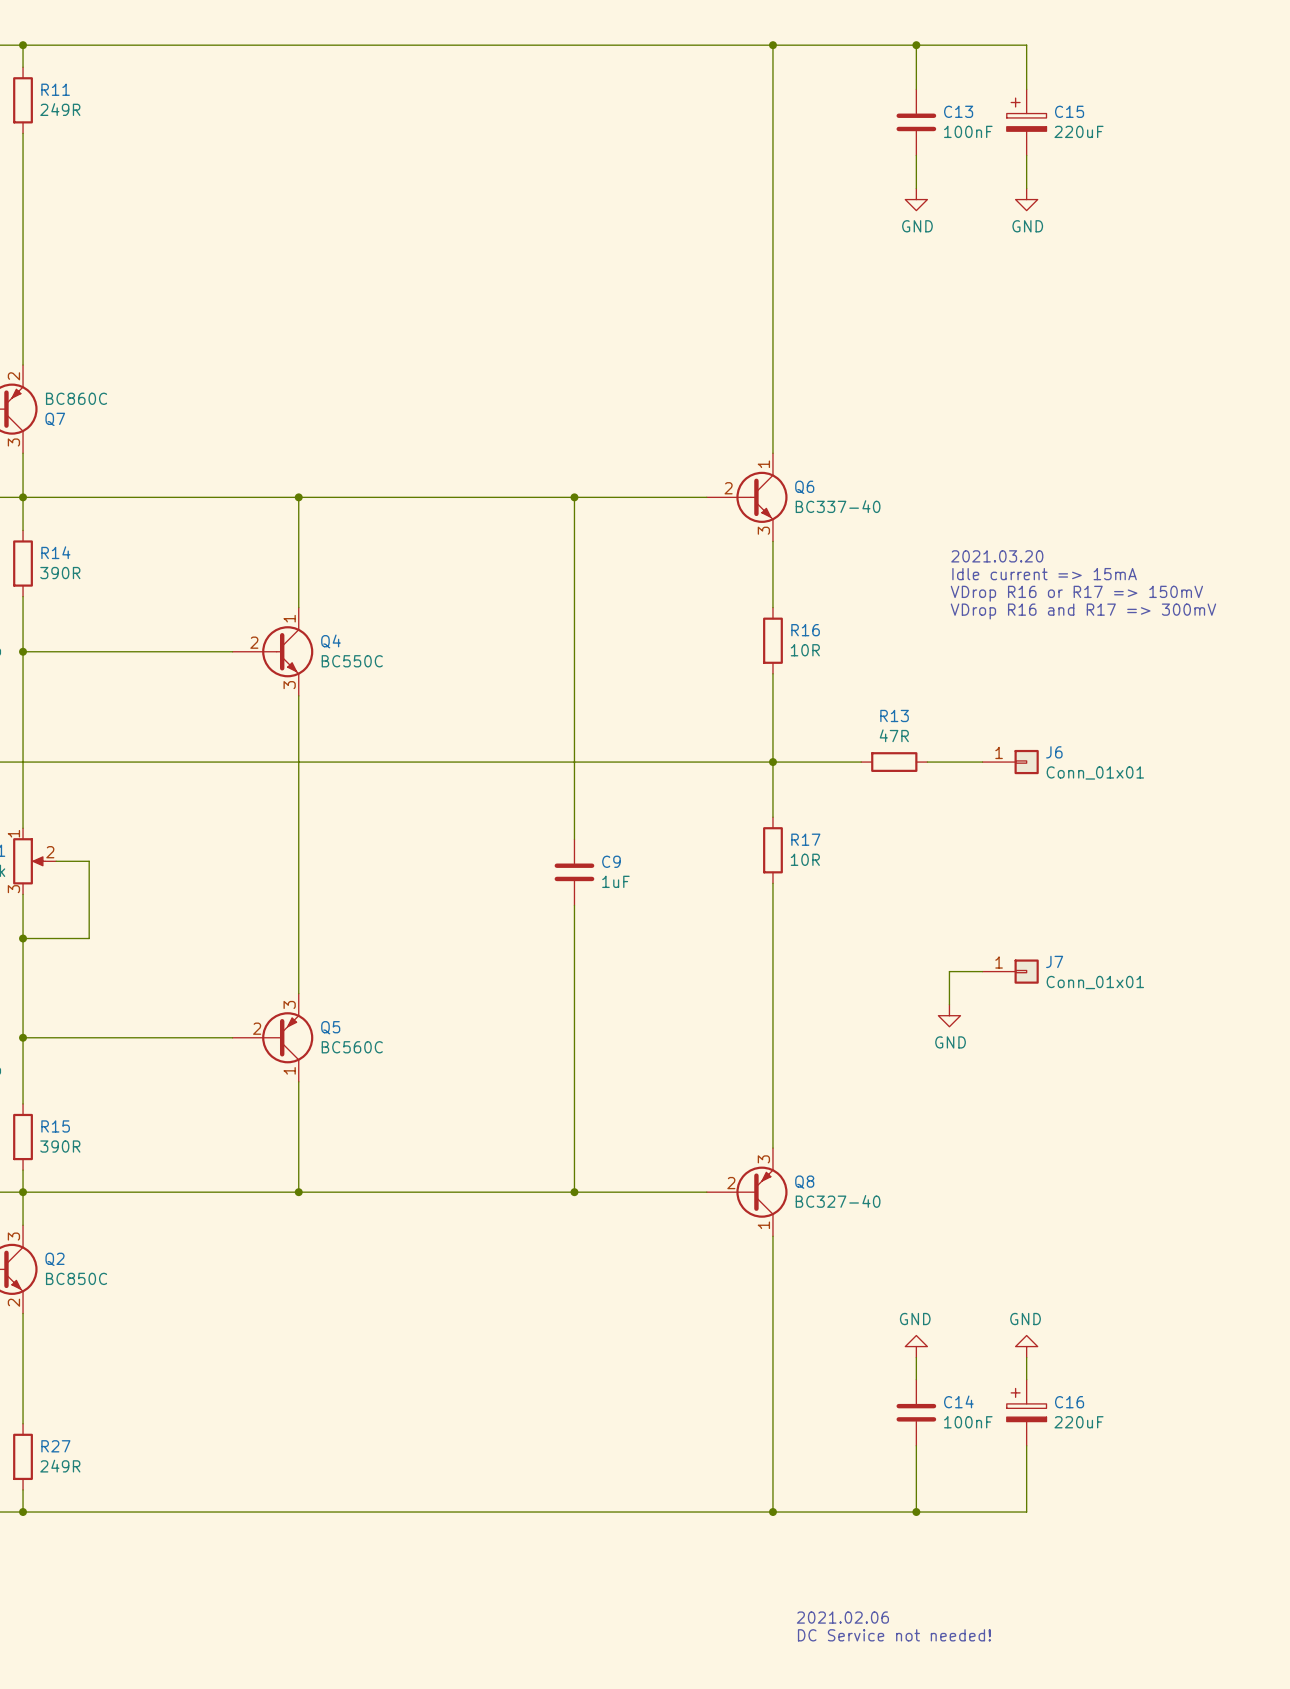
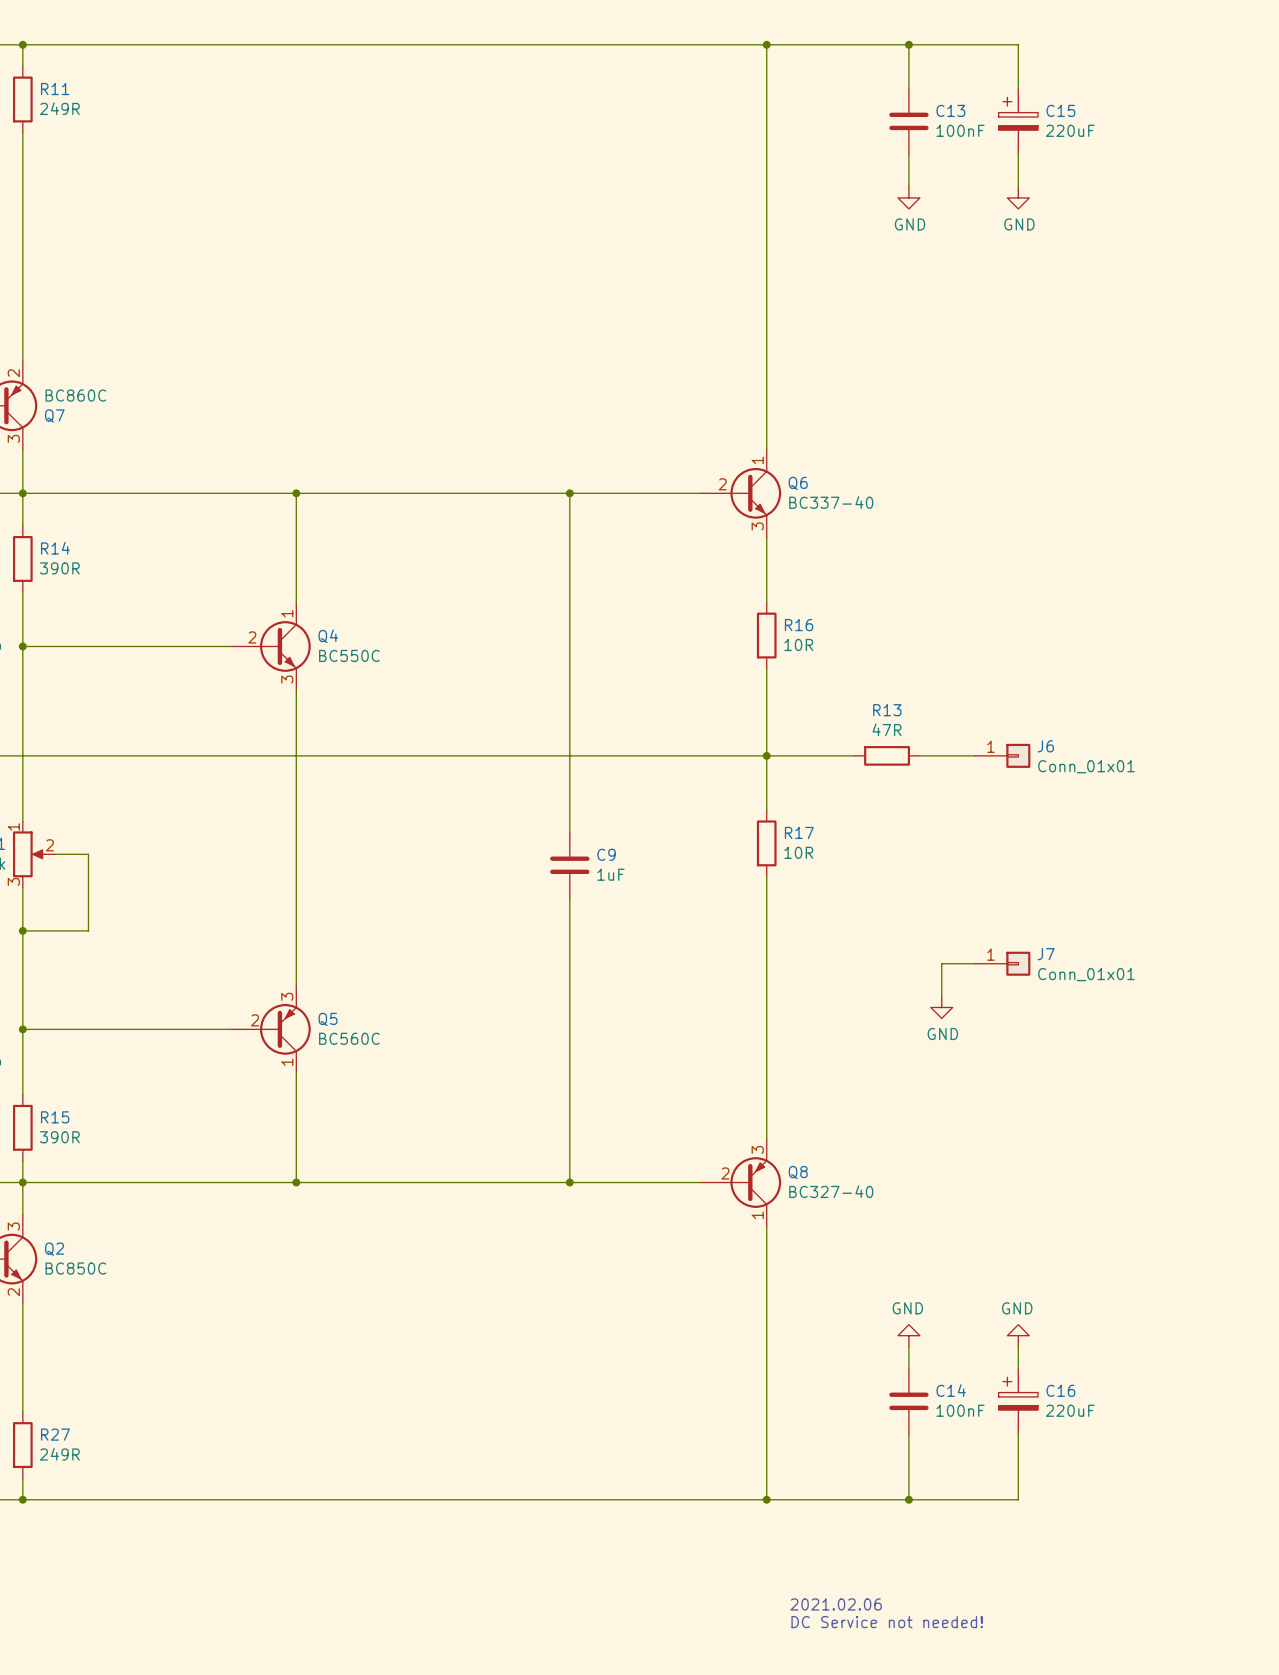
text: 2021.03.20 (997, 556) -> none
text: Idle current => 15mA (1044, 574) -> none
text: VDrop R16 or R17 => 150mV (1076, 593) -> none
text: VDrop R16 and R17 => 300mV (1083, 611) -> none

